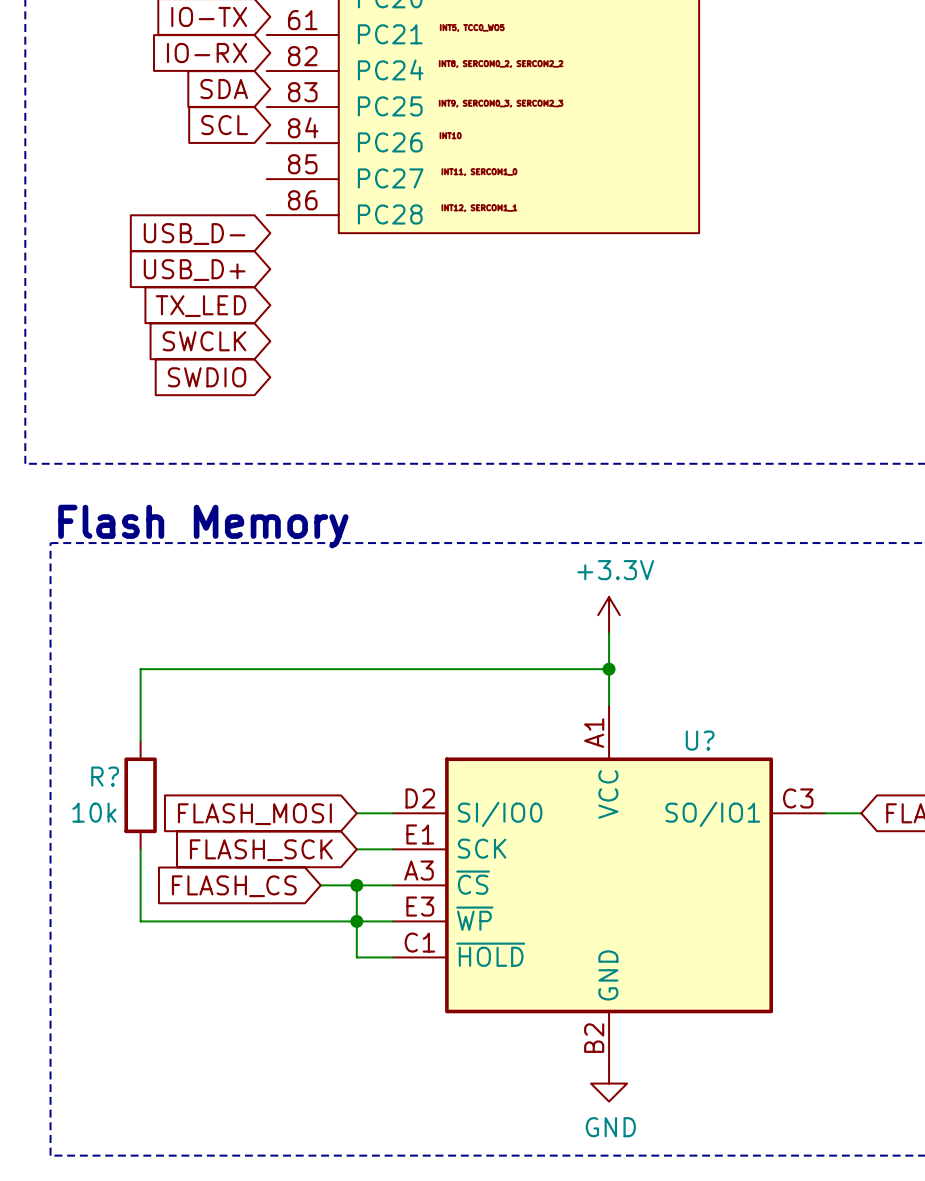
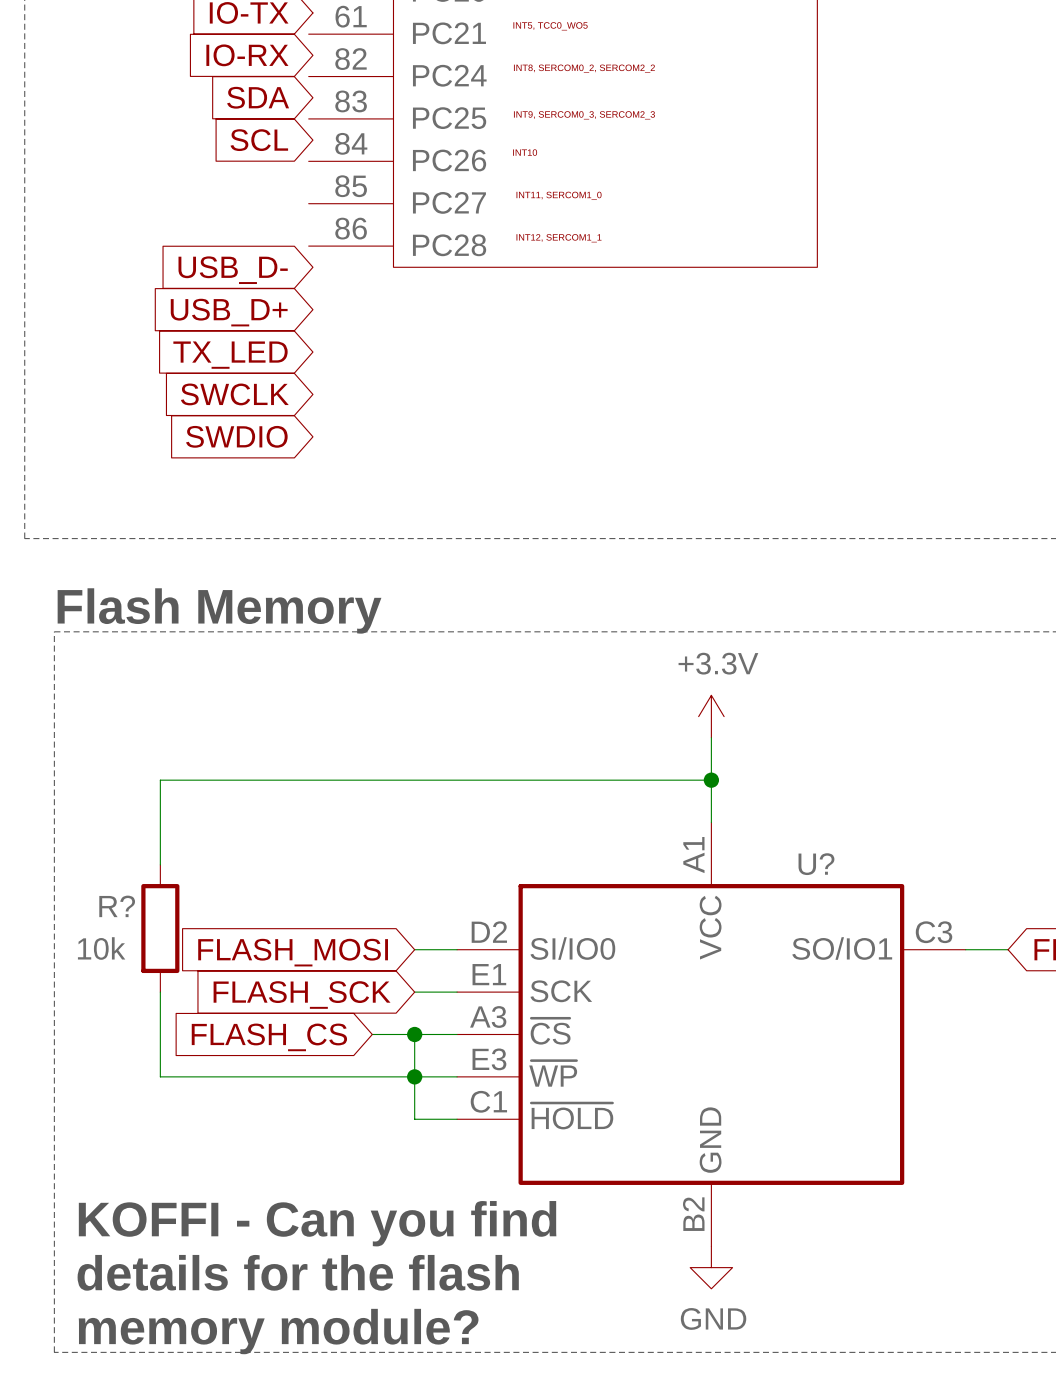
text: none -> KOFFI - Can you find (317, 1223)
text: none -> details for the flash (298, 1272)
text: none -> memory module? (278, 1331)

